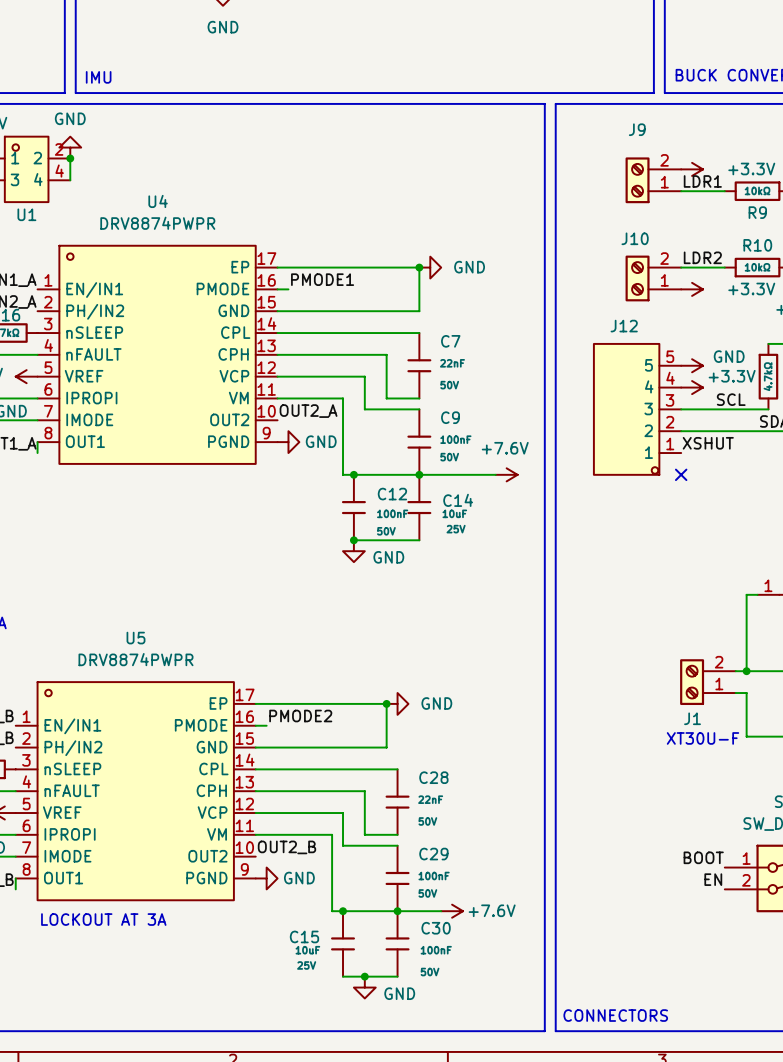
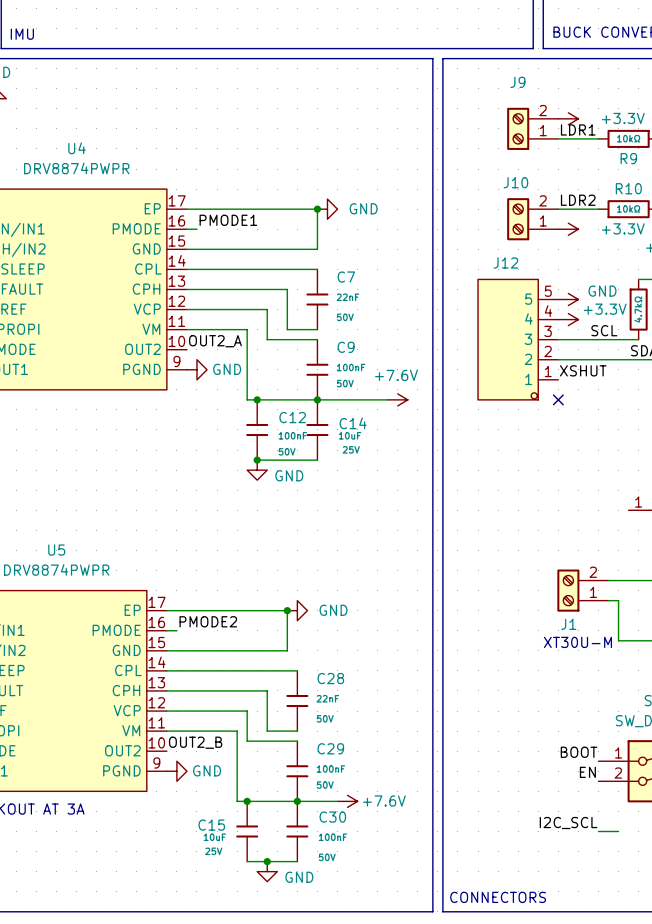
wire: (757, 594) (746, 594) (746, 671) -> none
junction: (746, 671) -> none
text: XT30U-F (702, 738) -> XT30U-M (577, 642)
label: none -> I2C_SCL (568, 823)
wire: none -> (598, 831) (618, 831)

